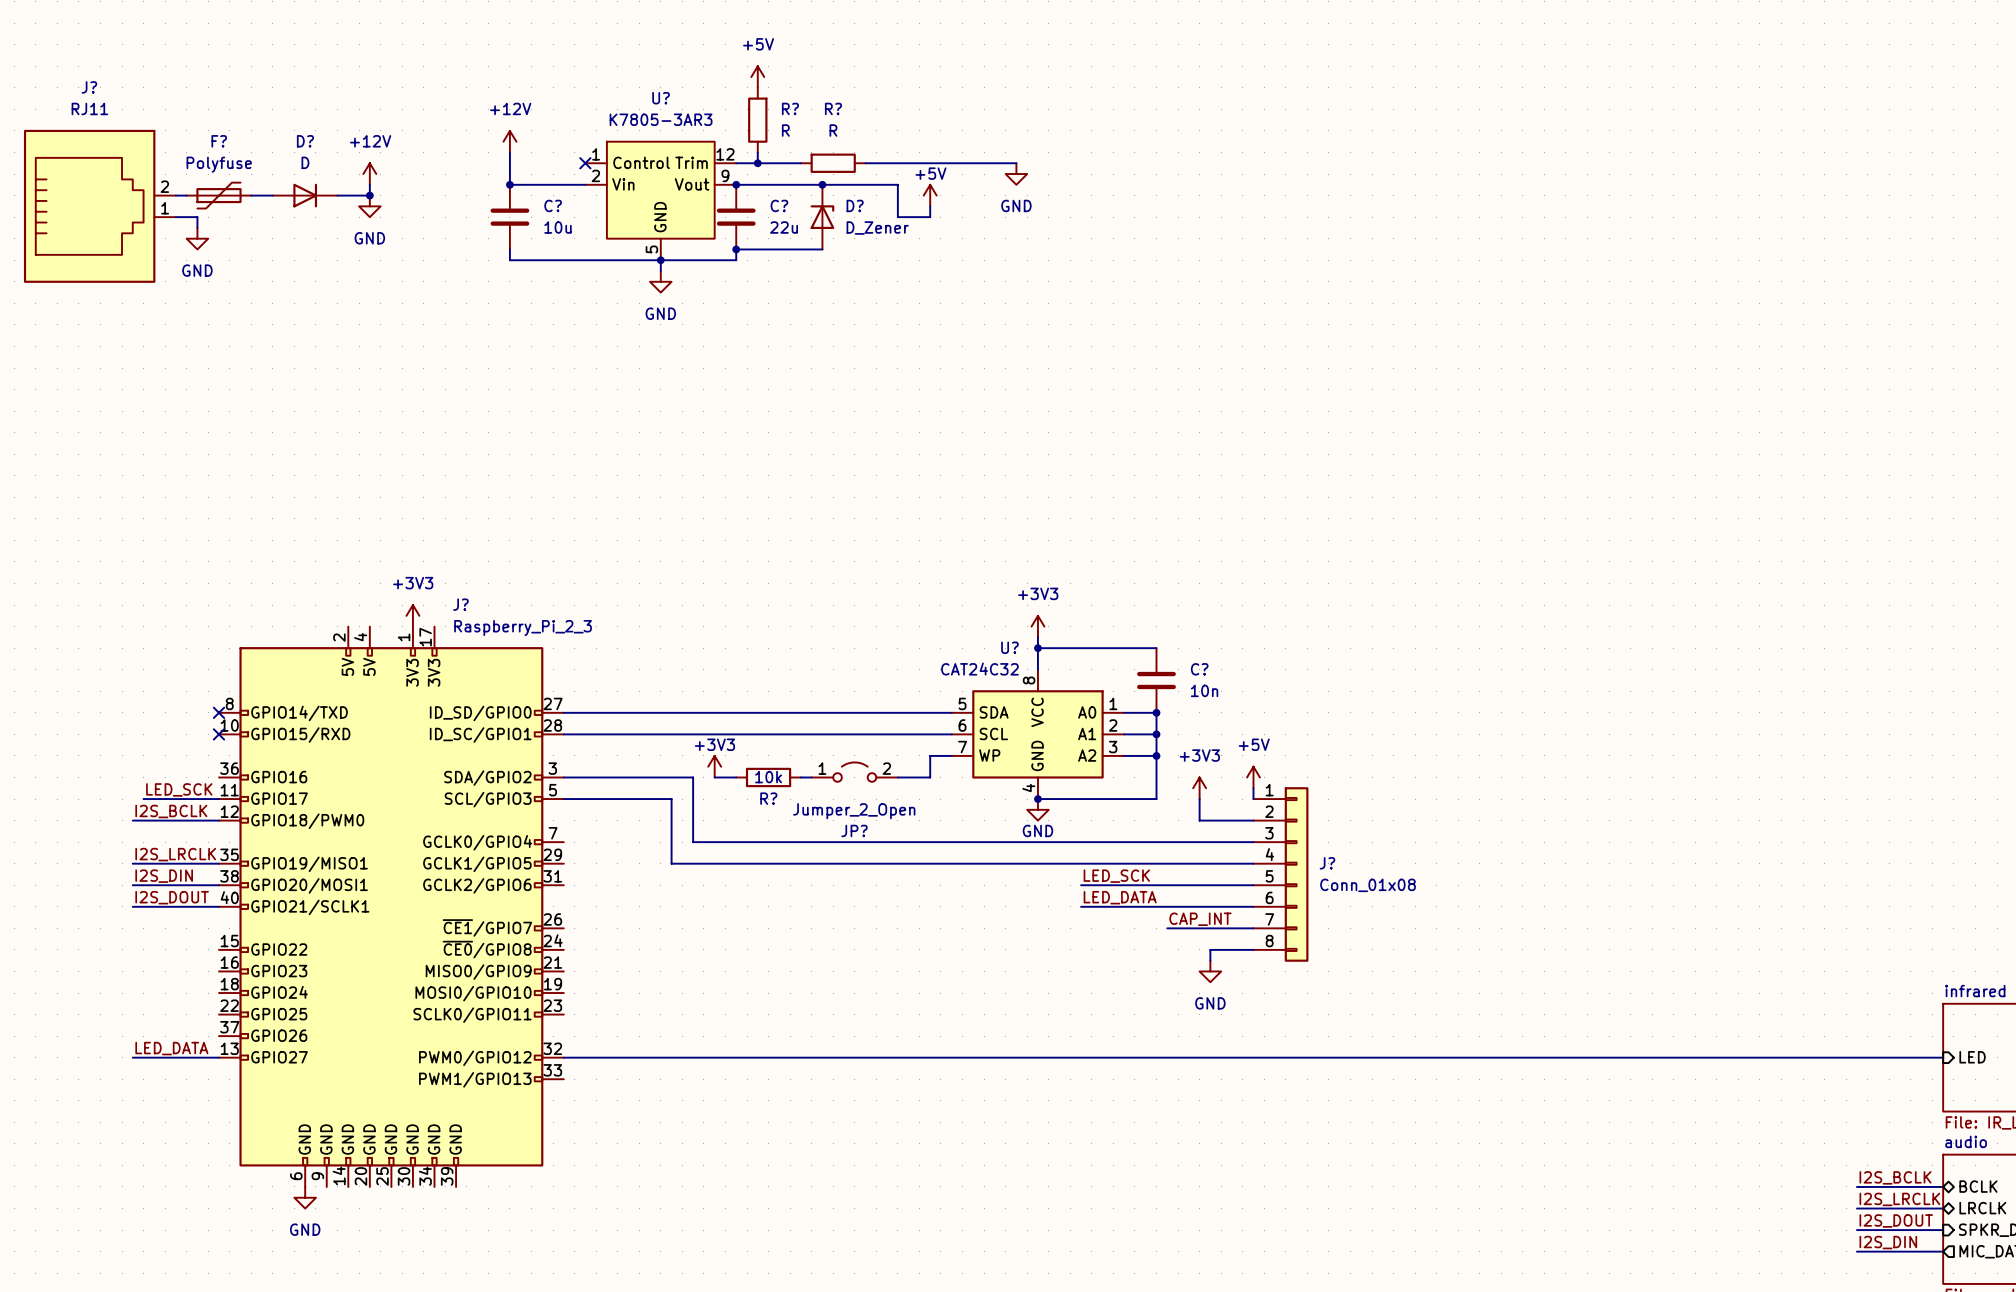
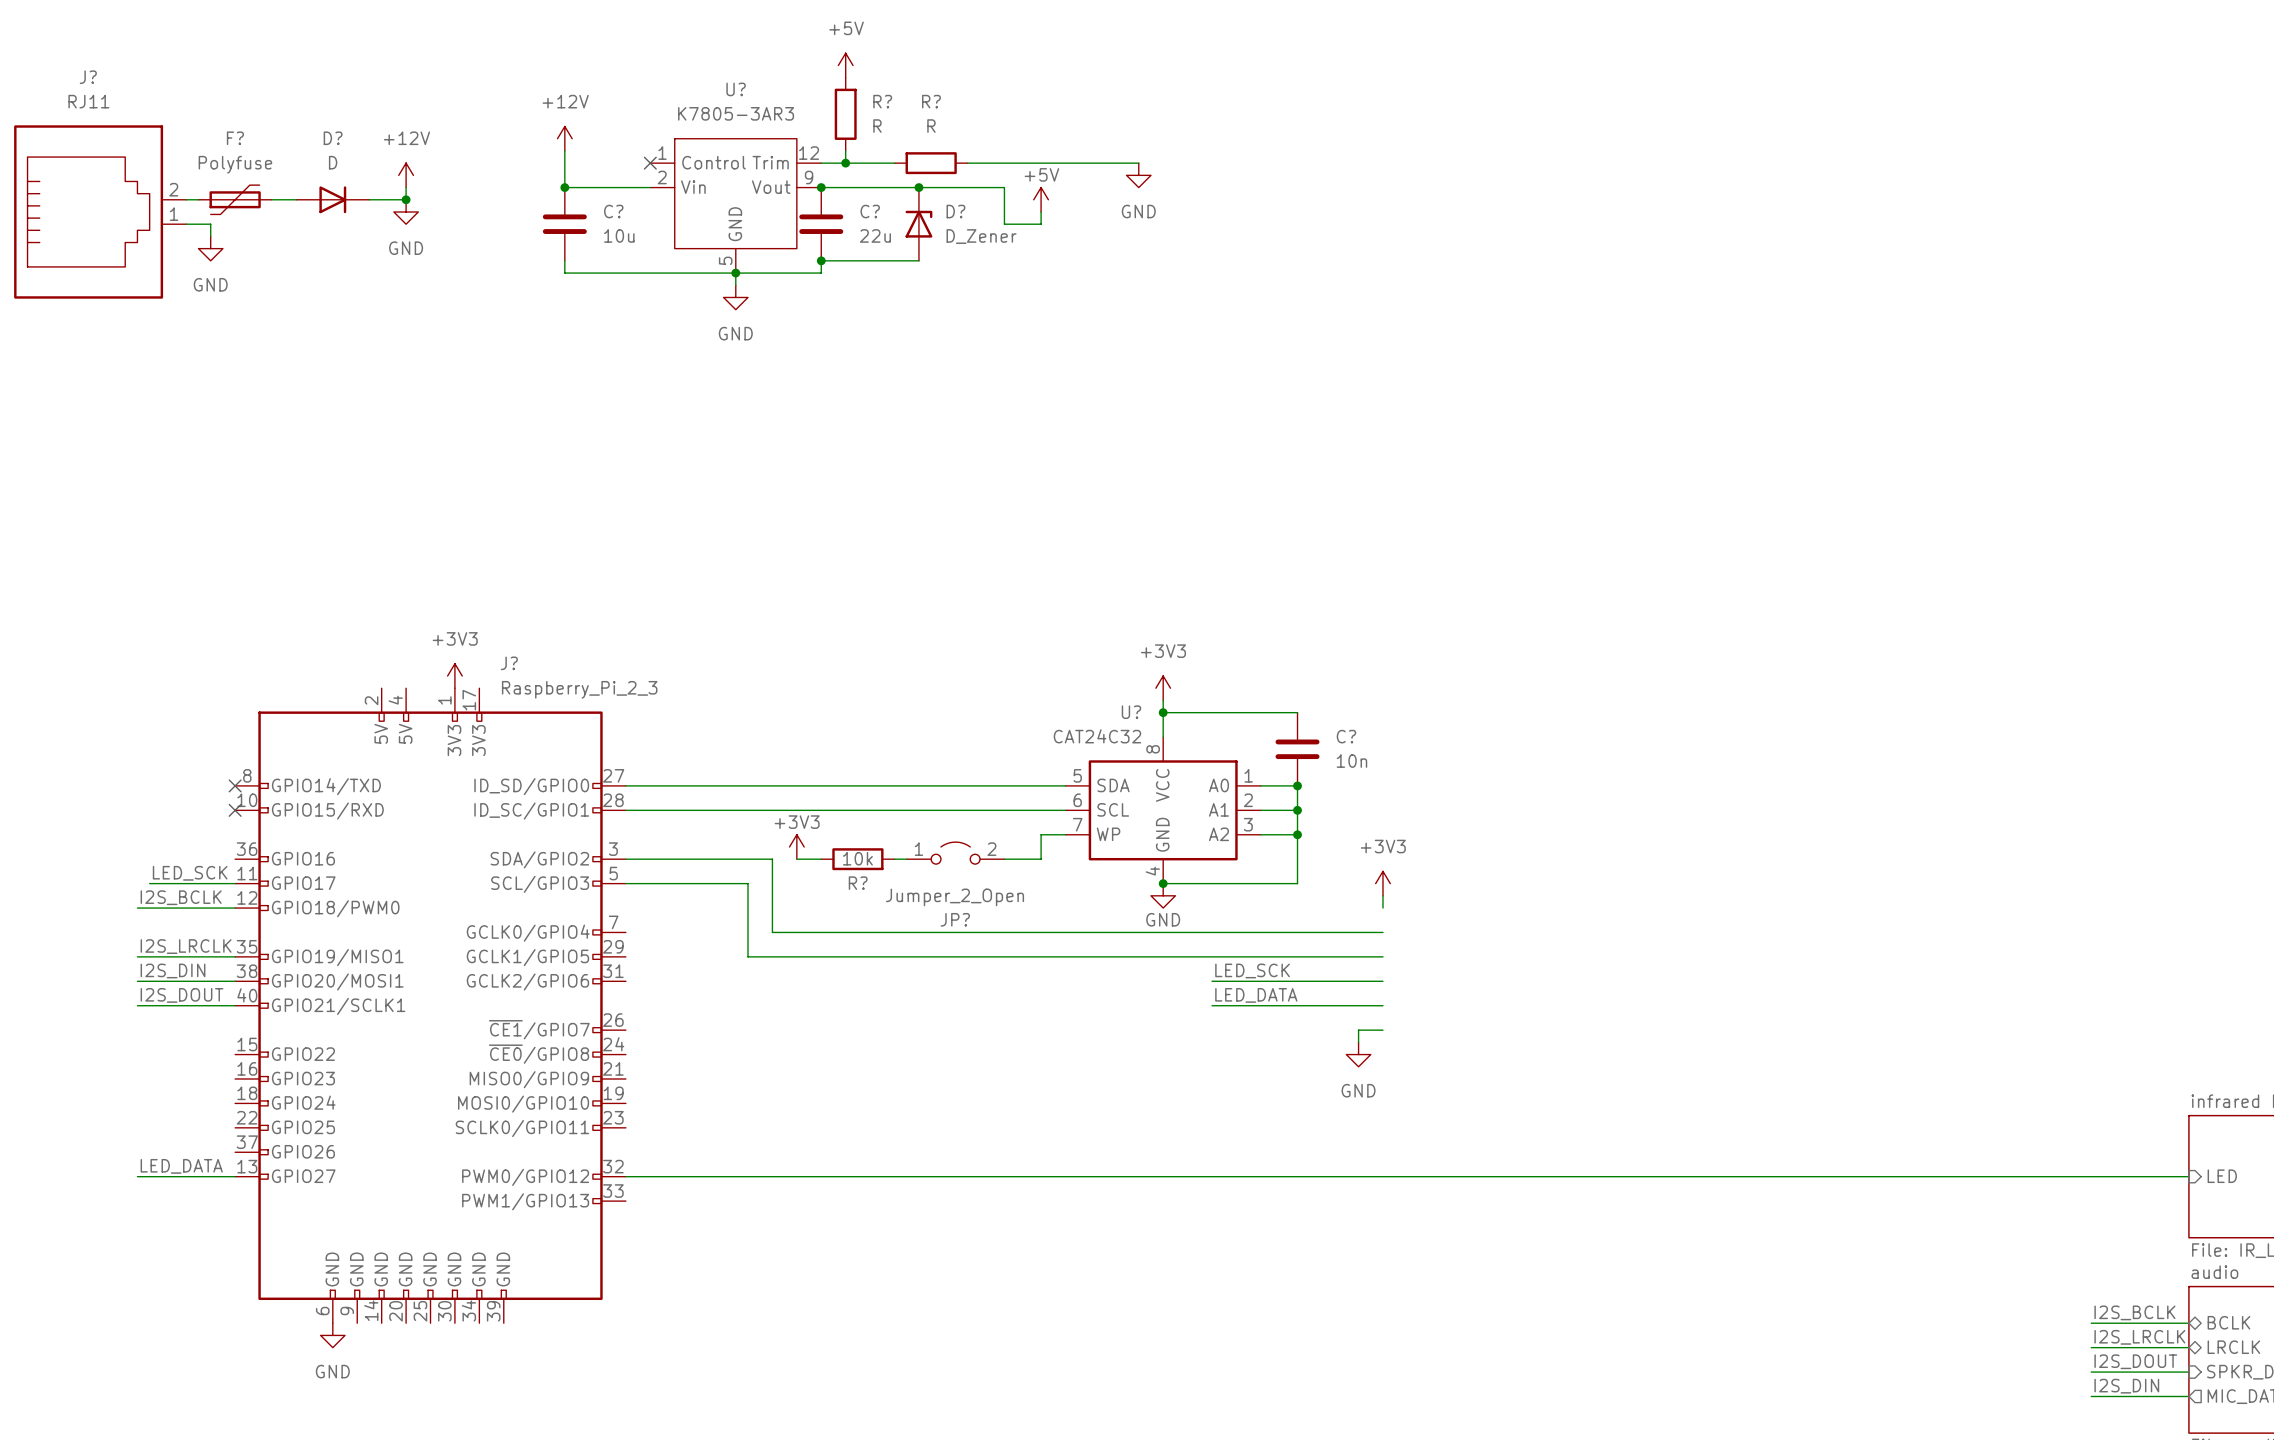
power symbol: +5V (1253, 777) -> none
power symbol position: +3V3 (1199, 788) -> +3V3 (1382, 883)
wire: (1253, 788) (1253, 799) -> (1382, 895) (1382, 908)
wire: (1199, 799) (1199, 820) (1253, 820) -> none
wire: (1231, 842) (1253, 842) -> none
wire: (1231, 863) (1253, 863) -> none
J?: Conn_01x08 (1280, 874) -> none
wire: (1231, 885) (1253, 885) -> none
wire: (1231, 906) (1253, 906) -> none
label: CAP_INT (1200, 919) -> none
wire: (1167, 928) (1210, 928) -> (1358, 1042) (1358, 1030)
wire: (1231, 928) (1253, 928) -> none
wire: (1253, 949) (1210, 949) (1210, 960) -> none
power symbol position: GND (1210, 971) -> GND (1358, 1054)

